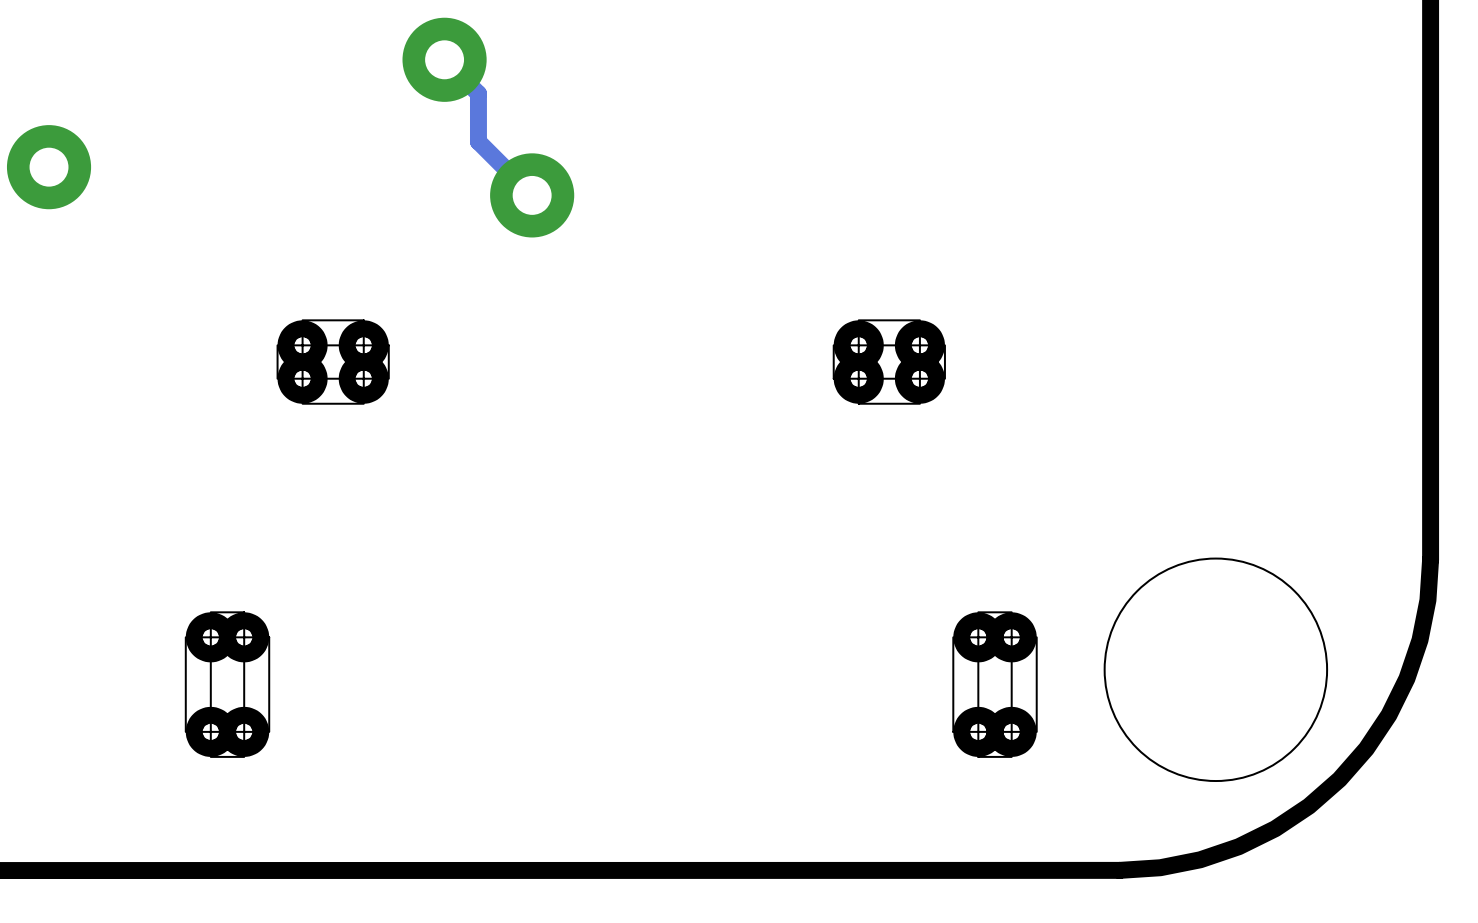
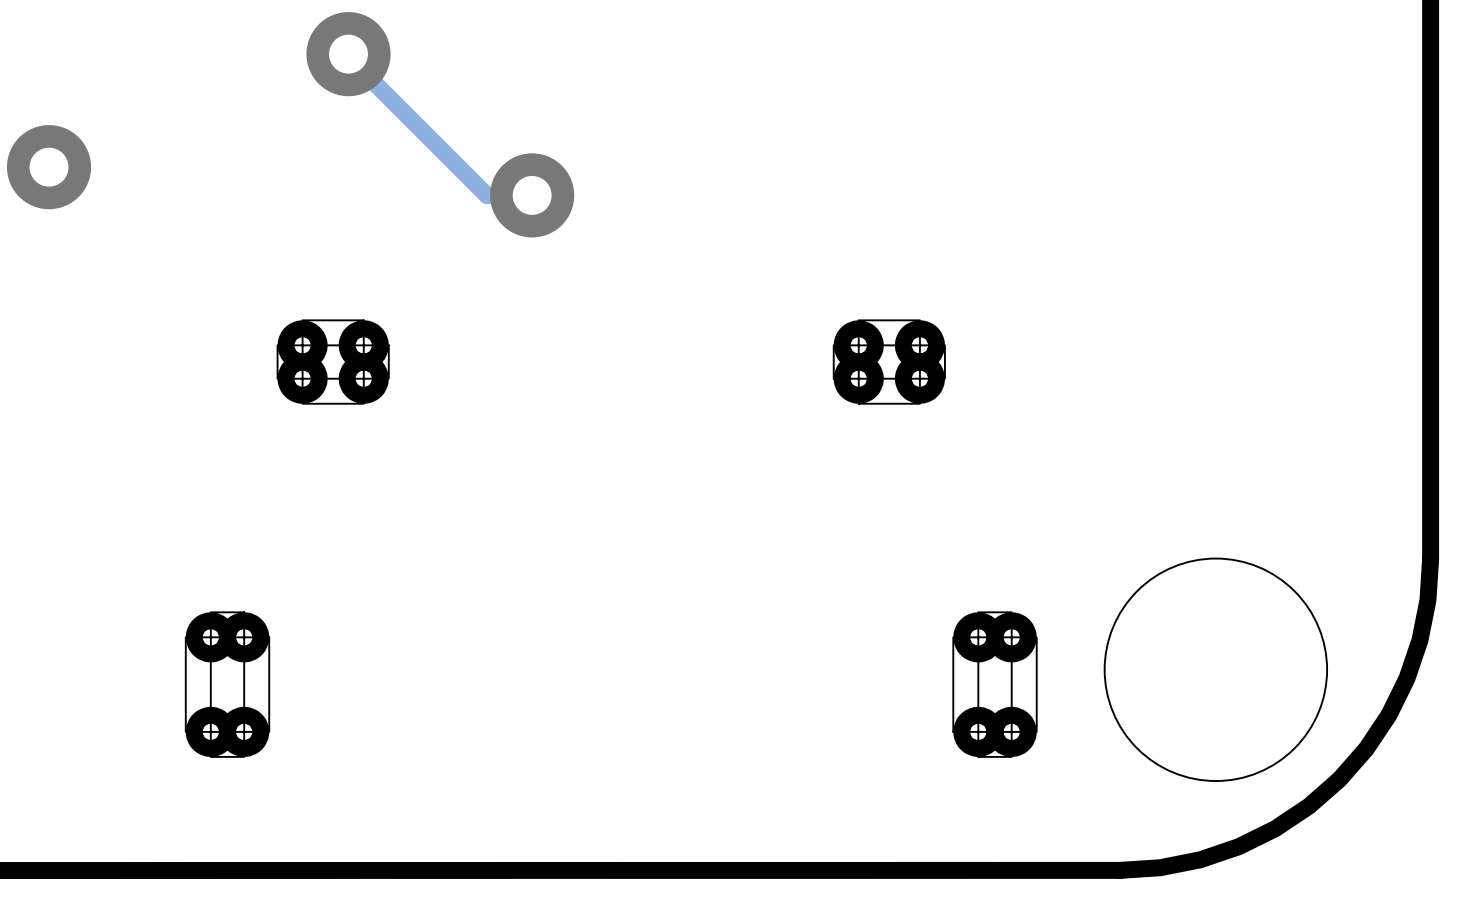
track: (444, 59) (478, 93) (478, 141) (532, 195) -> (348, 54) (348, 56) (486, 195) (532, 195)
via position: (444, 59) -> (348, 54)

